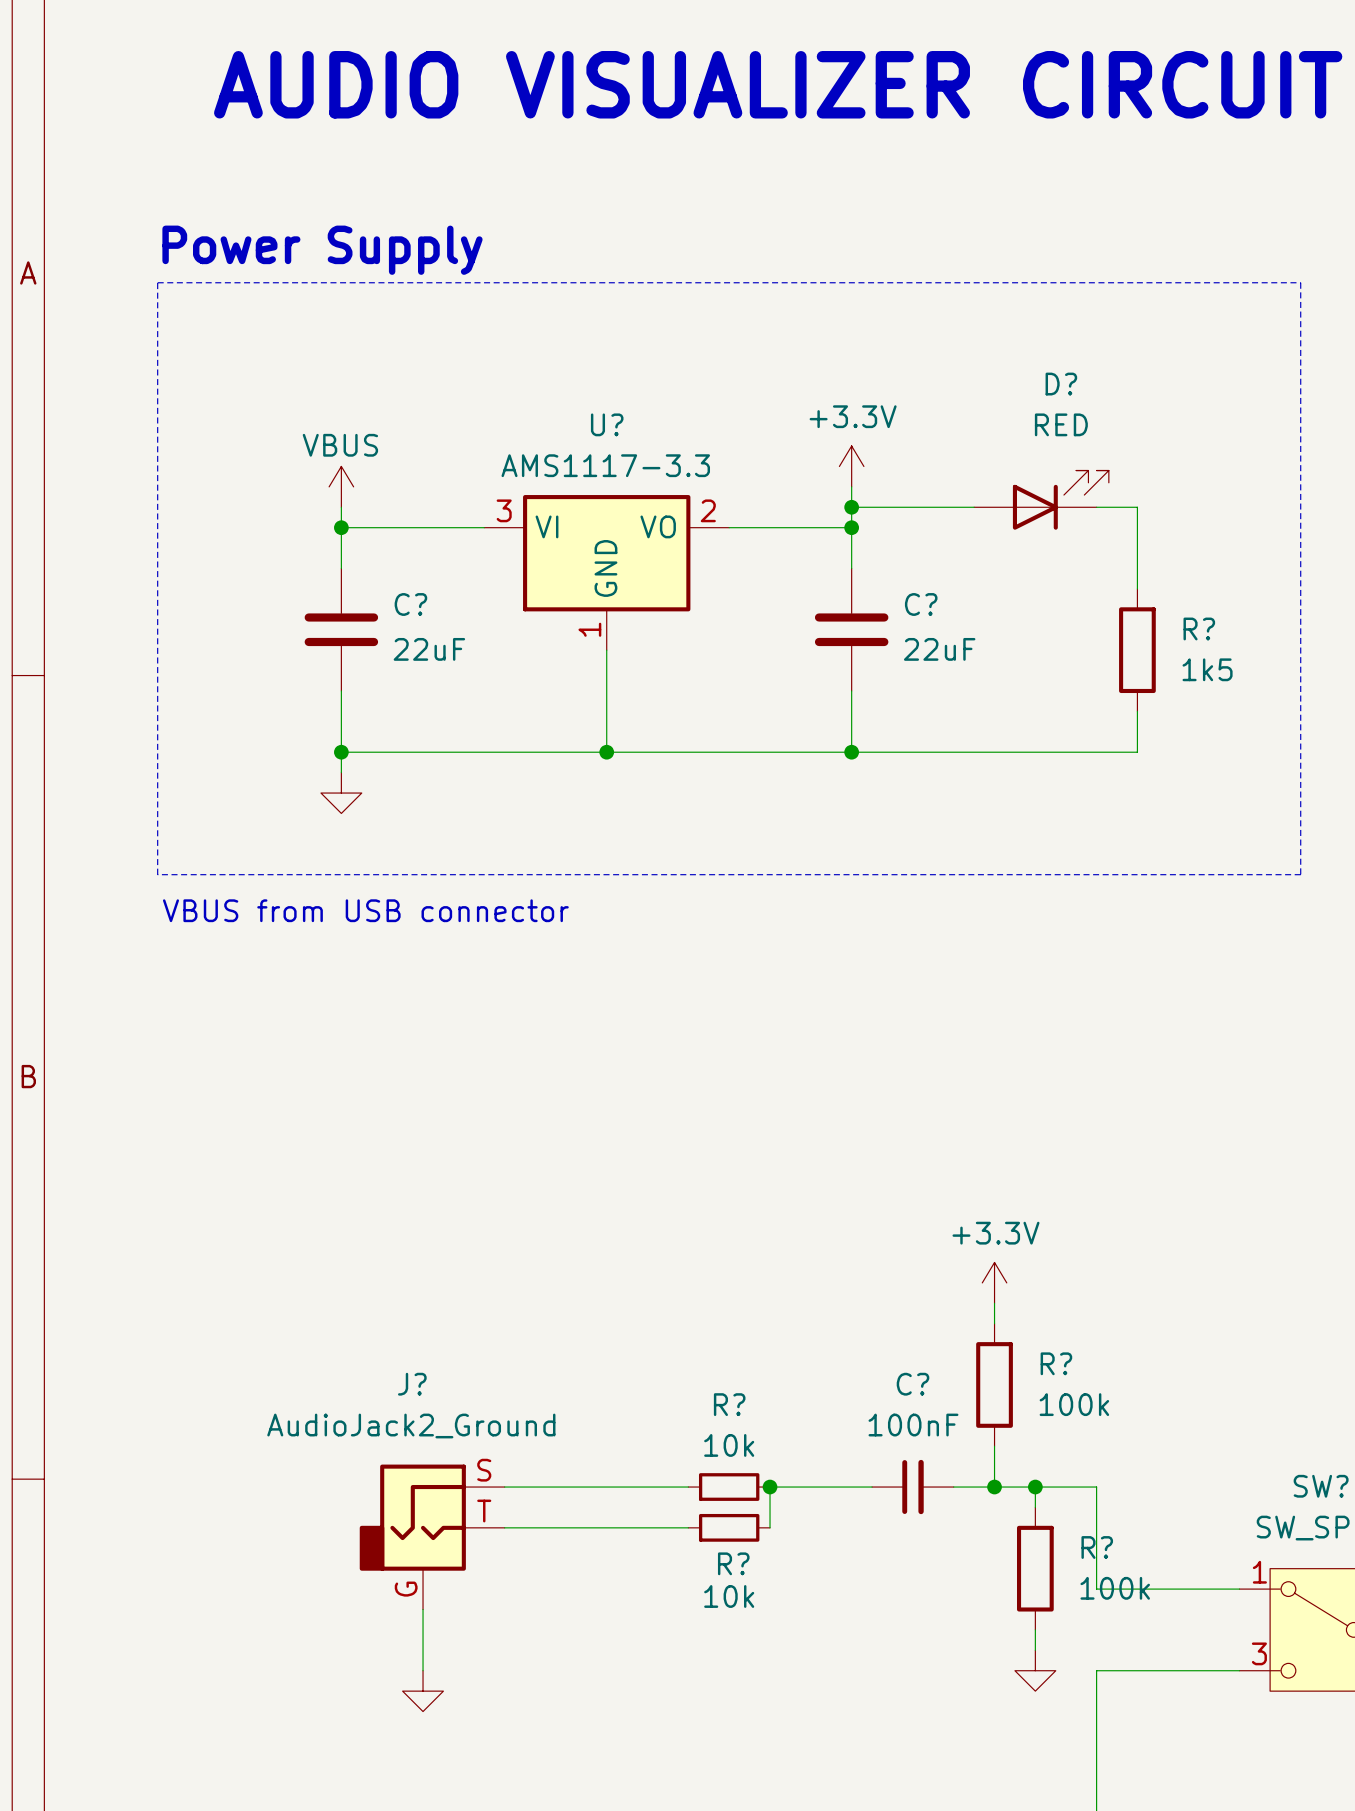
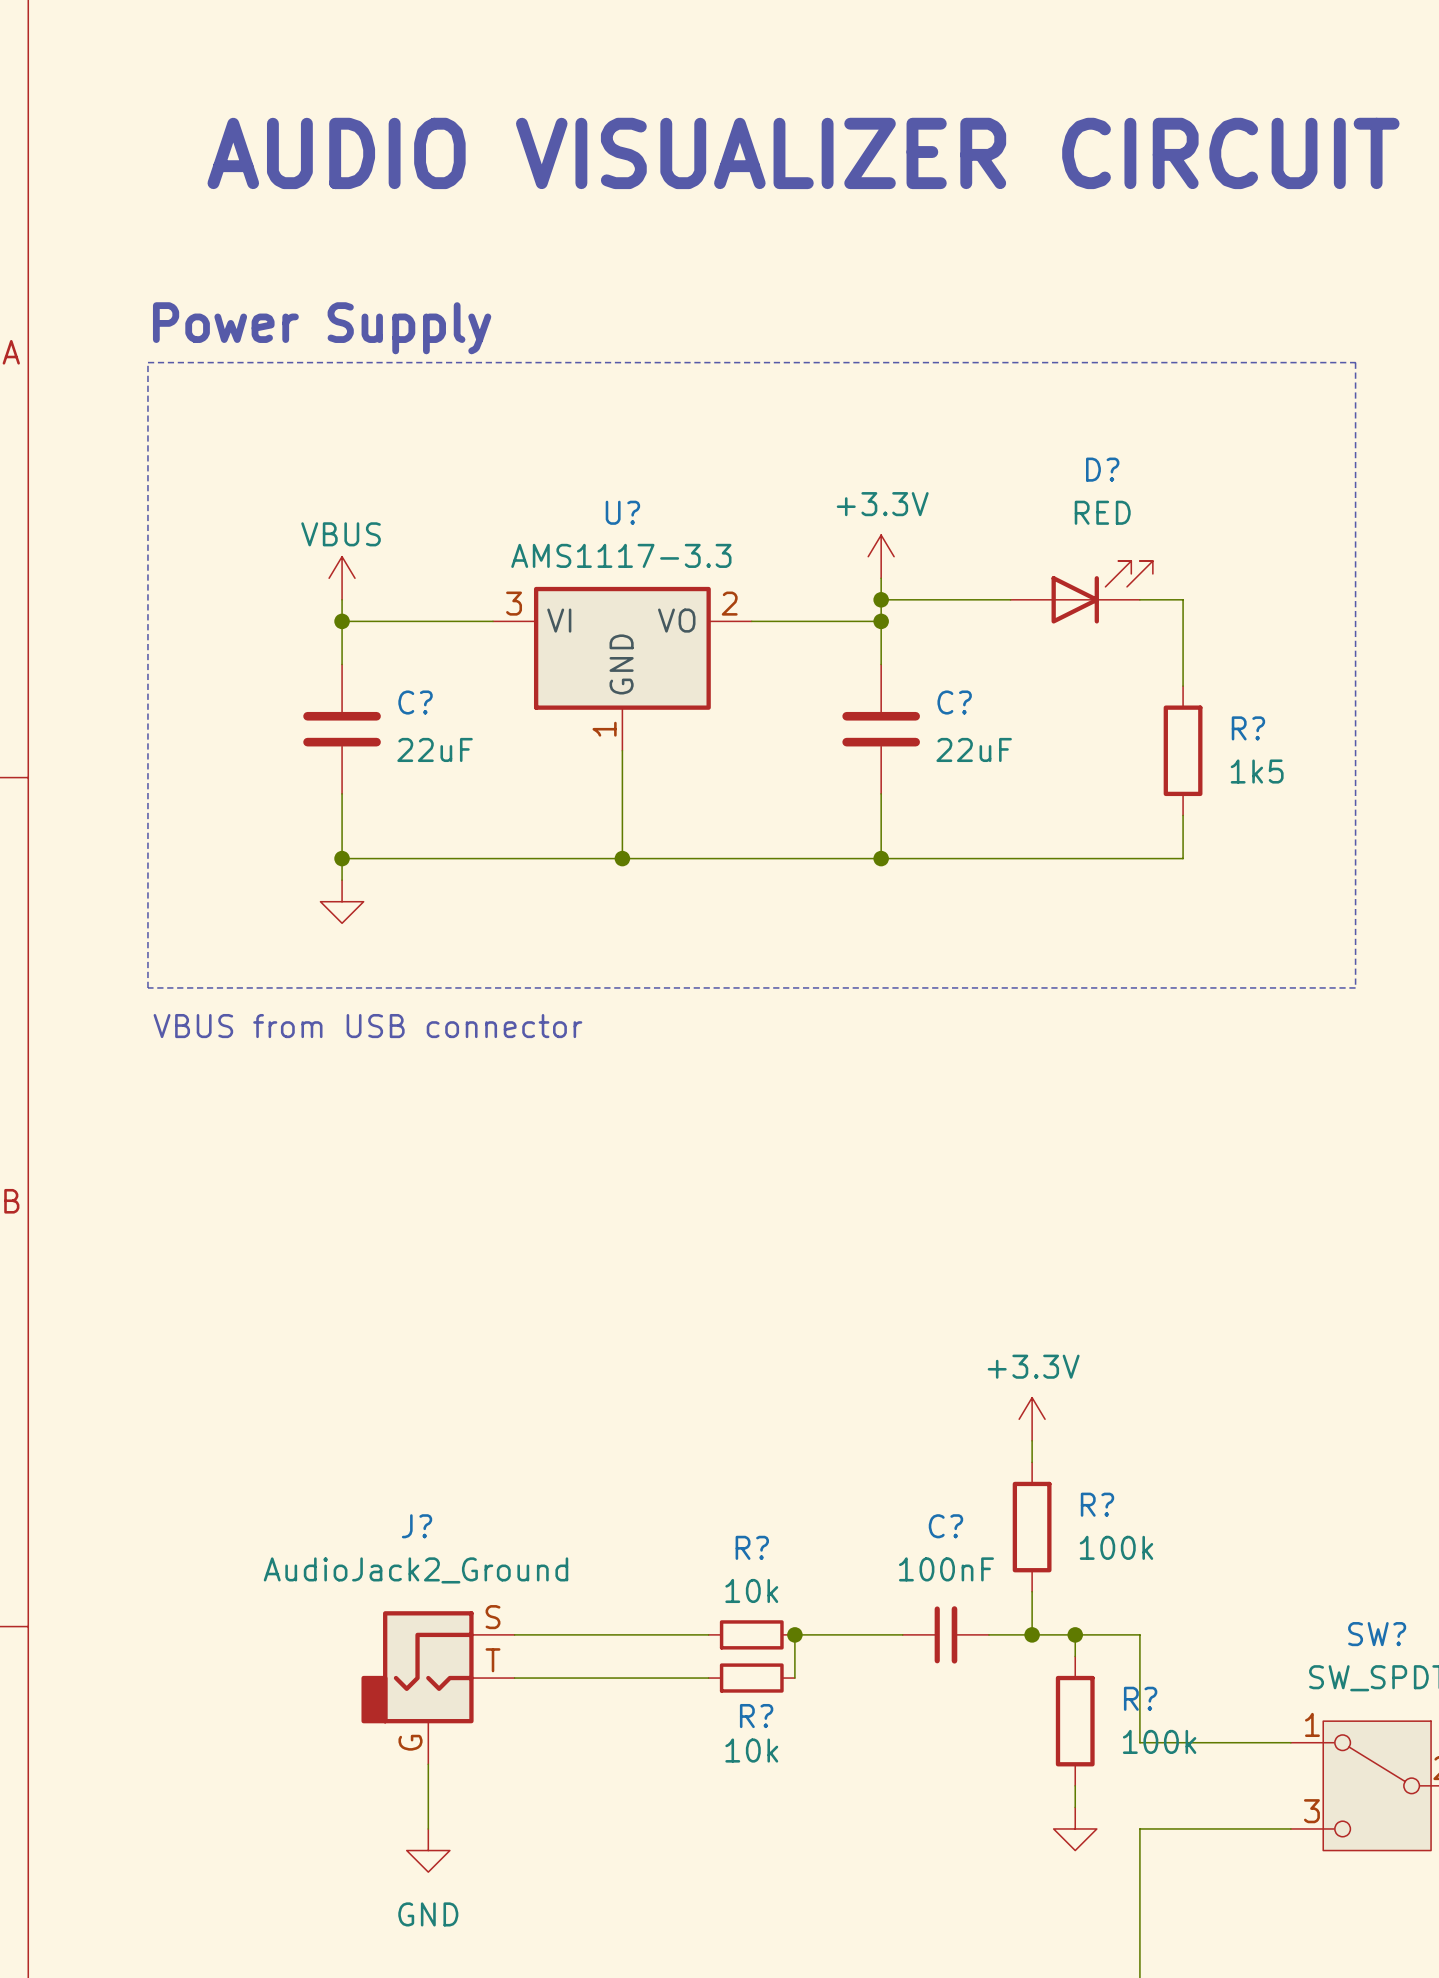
power symbol text: none -> GND (428, 1914)

